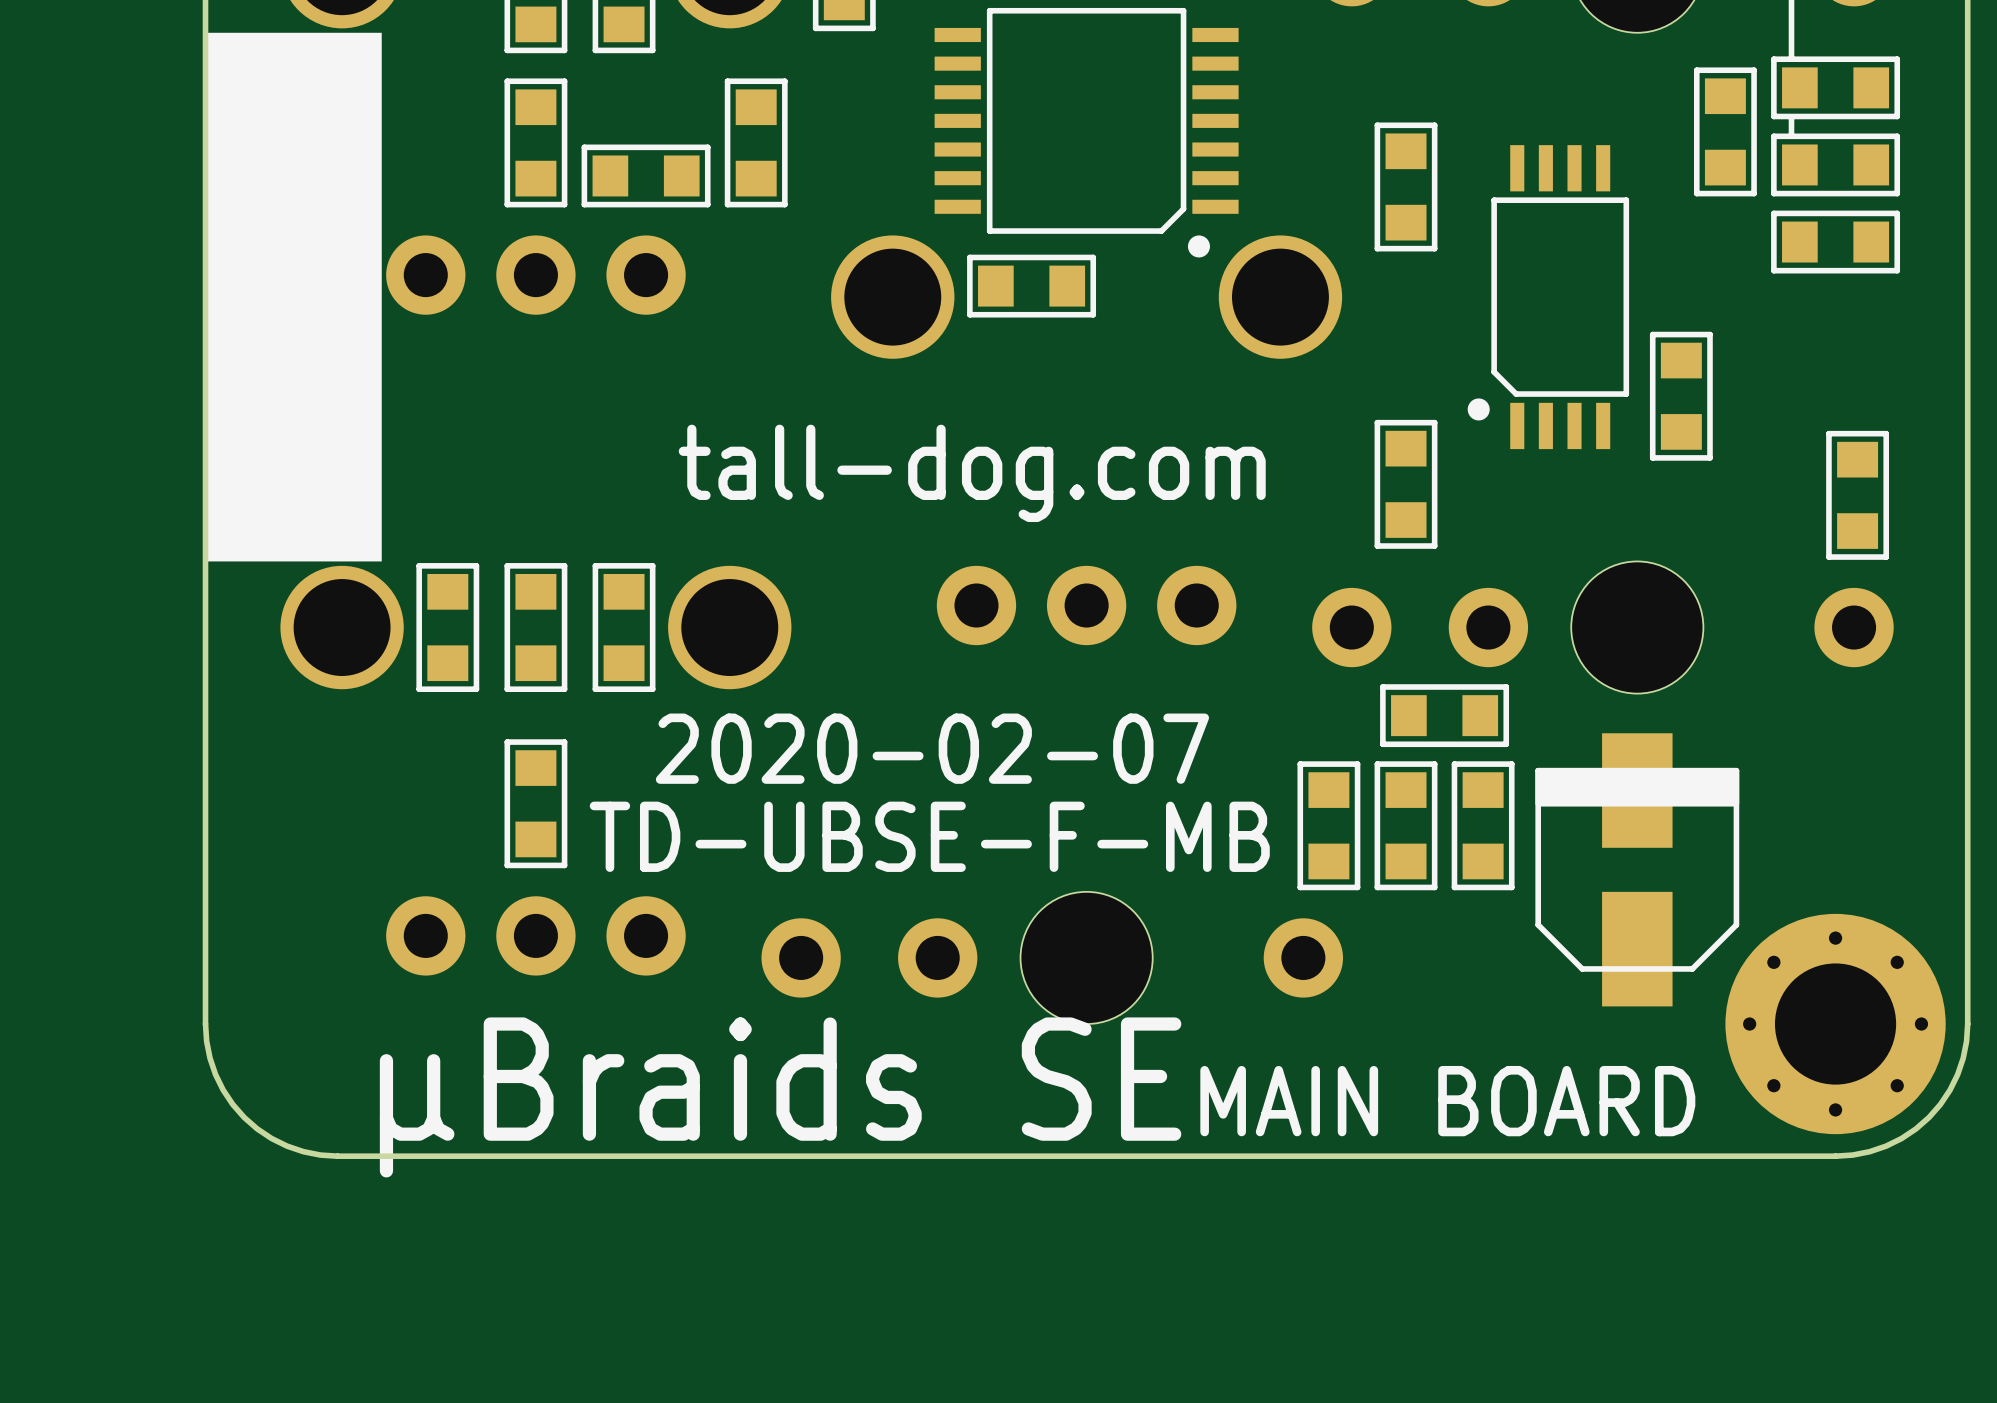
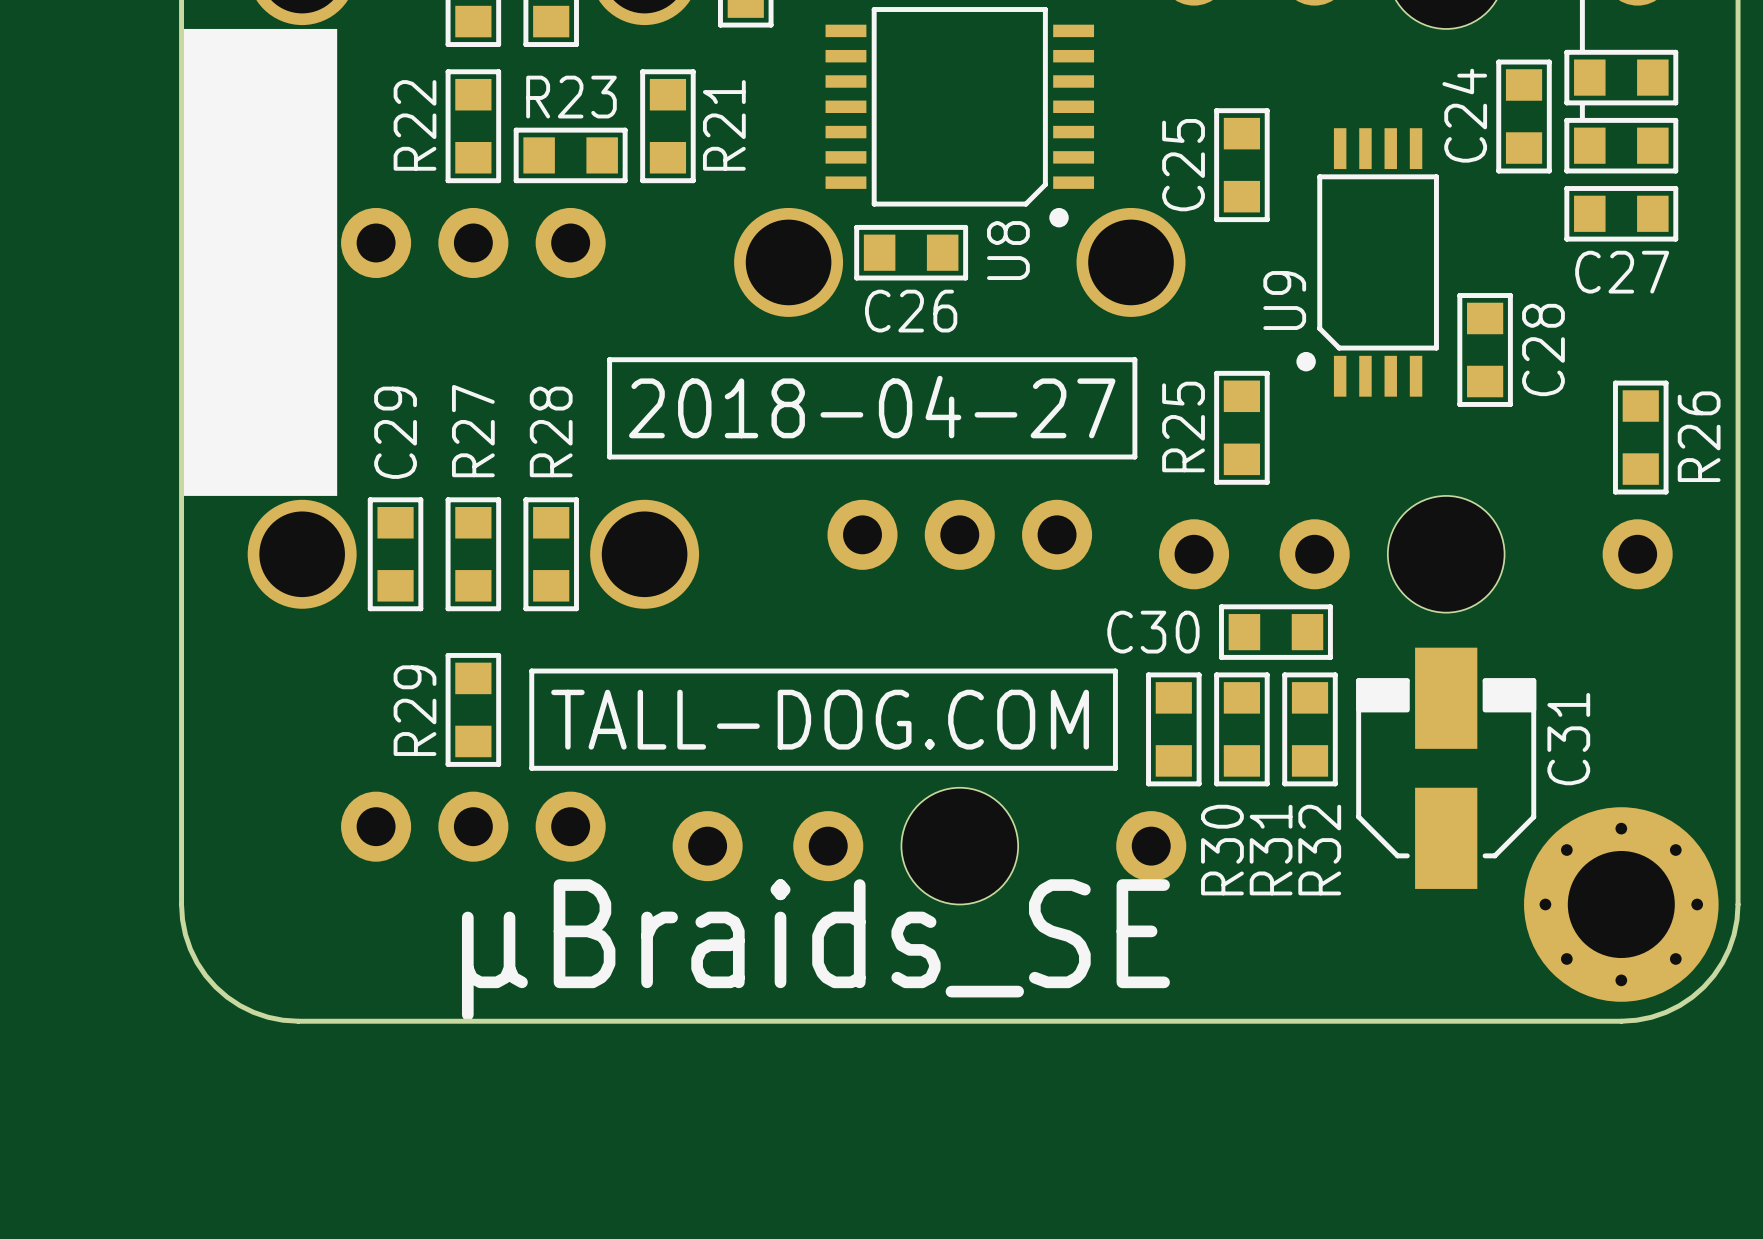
R23 name: none -> R23 (571, 97)
C24 name: none -> C24 (1464, 115)
R22 name: none -> R22 (415, 125)
R21 name: none -> R21 (724, 125)
C25 name: none -> C25 (1183, 165)
U8 name: none -> U8 (1008, 250)
C27 name: none -> C27 (1622, 272)
U9 name: none -> U9 (1284, 300)
C26 name: none -> C26 (911, 311)
C28 name: none -> C28 (1543, 349)
line: none -> (1134, 359) (1134, 457) (609, 457) (609, 359) (1134, 359)
text: tall-dog.com (972, 473) -> 2018-04-27 (872, 407)
R25 name: none -> R25 (1183, 426)
R27 name: none -> R27 (473, 431)
C29 name: none -> C29 (395, 432)
R28 name: none -> R28 (551, 431)
R26 name: none -> R26 (1699, 436)
C30 name: none -> C30 (1153, 632)
text: 2020-02-07 (932, 748) -> none
line: none -> (1115, 671) (531, 671) (531, 768) (1115, 768) (1115, 671)
R29 name: none -> R29 (415, 710)
text: TD-UBSE-F-MB (929, 836) -> TALL-DOG.COM (820, 719)
part: (1637, 869) -> none
C31: none -> (1446, 768)
R30 name: none -> R30 (1222, 850)
R31 name: none -> R31 (1271, 850)
R32 name: none -> R32 (1319, 850)
text: µBraids SE (780, 1097) -> µBraids_SE (815, 949)
text: MAIN BOARD (1447, 1101) -> none

